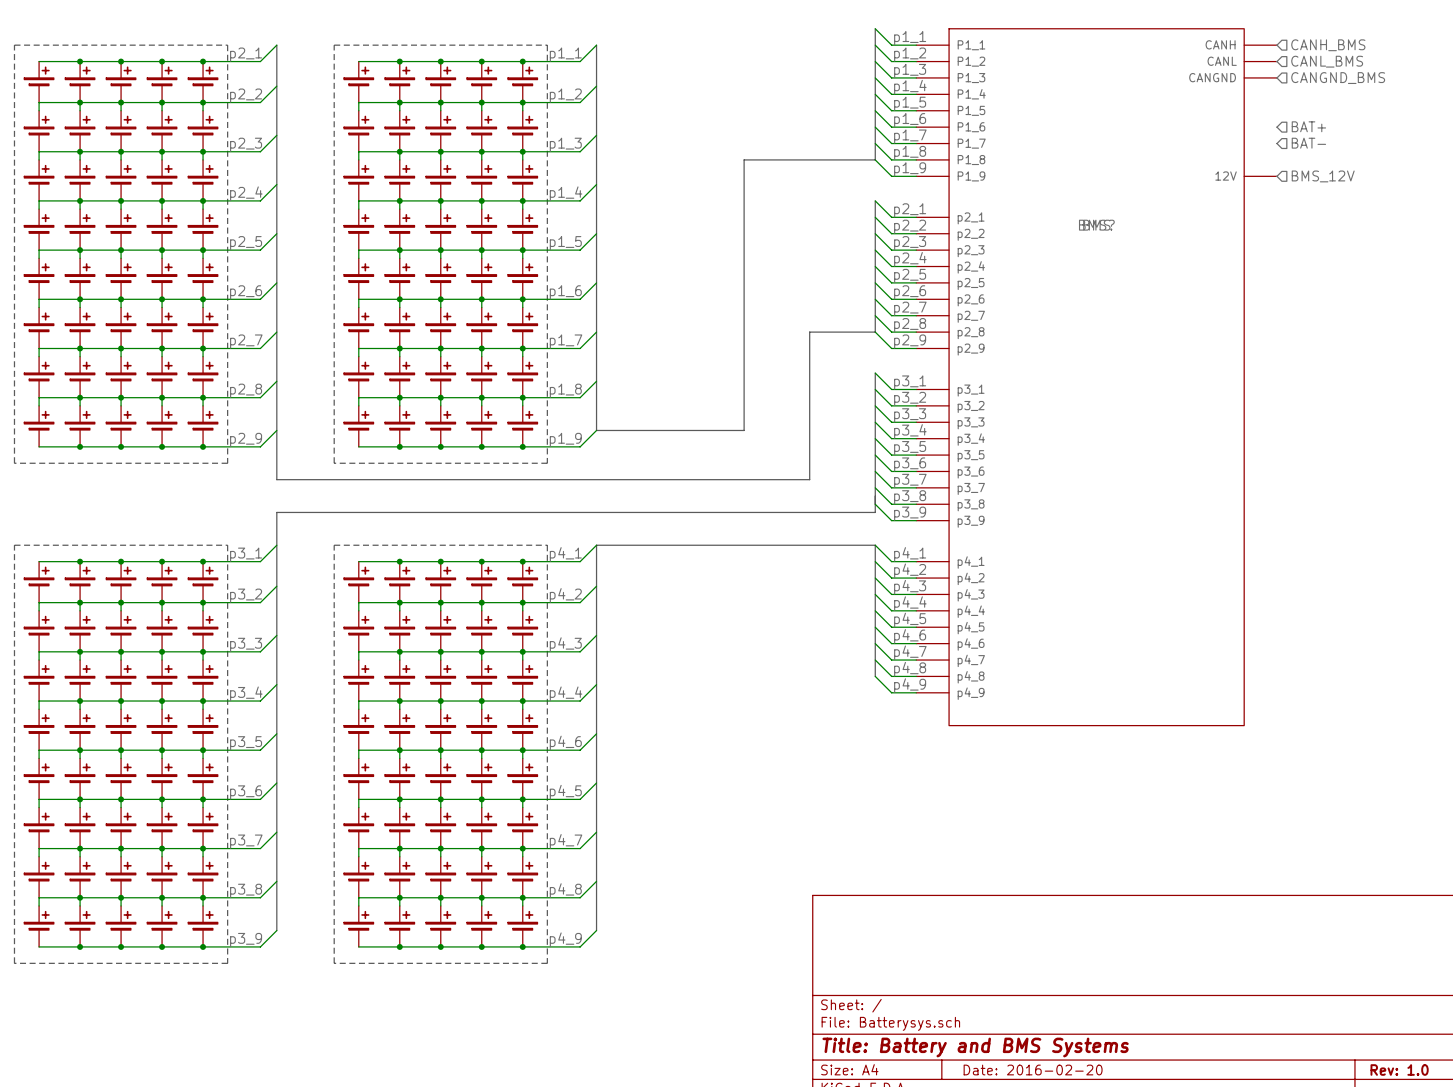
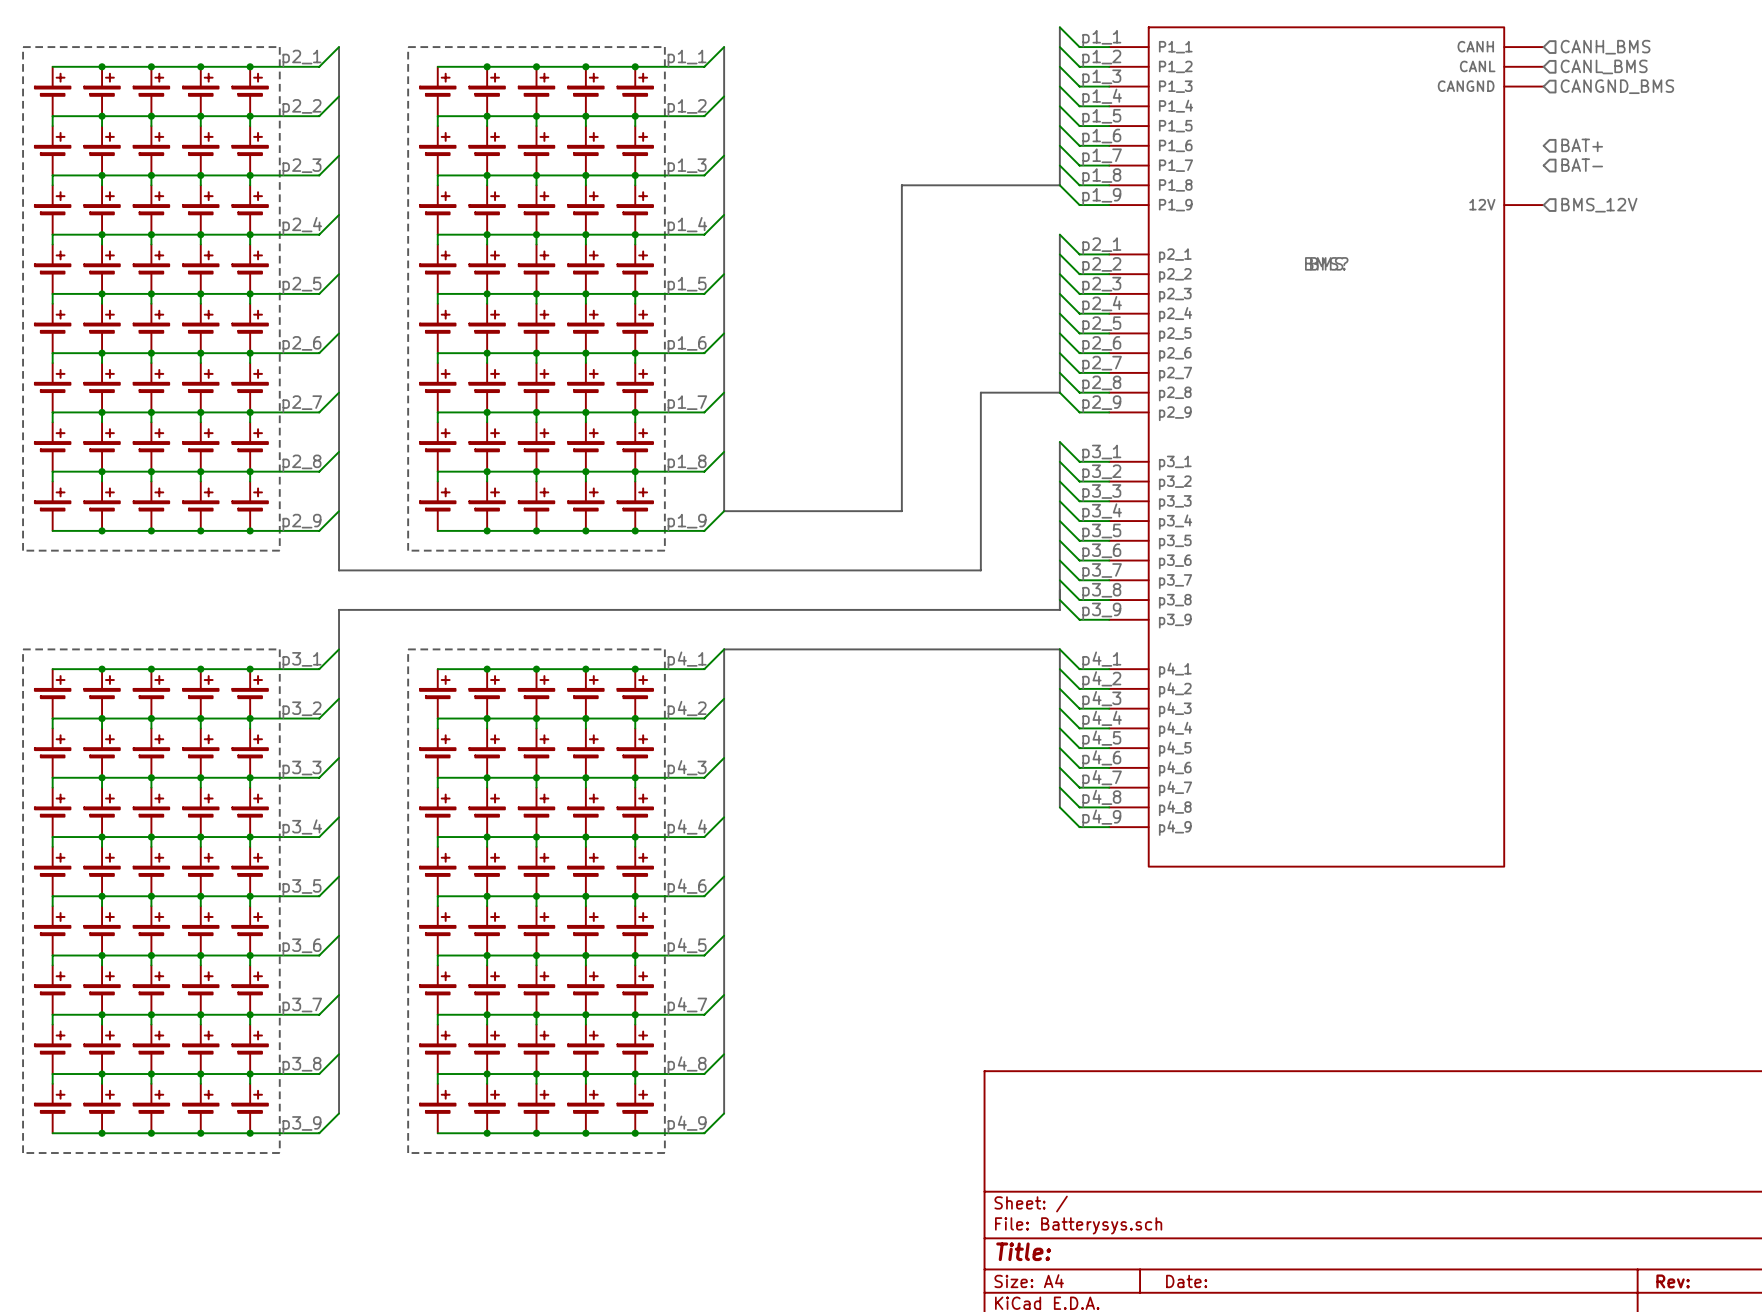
title block: Title: Battery and BMS Systems (975, 1047) -> Title: (1023, 1251)
title block: Date: 2016-02-20 (1033, 1070) -> Date: (1186, 1281)
title block: Rev: 1.0 (1399, 1070) -> Rev: (1673, 1281)

